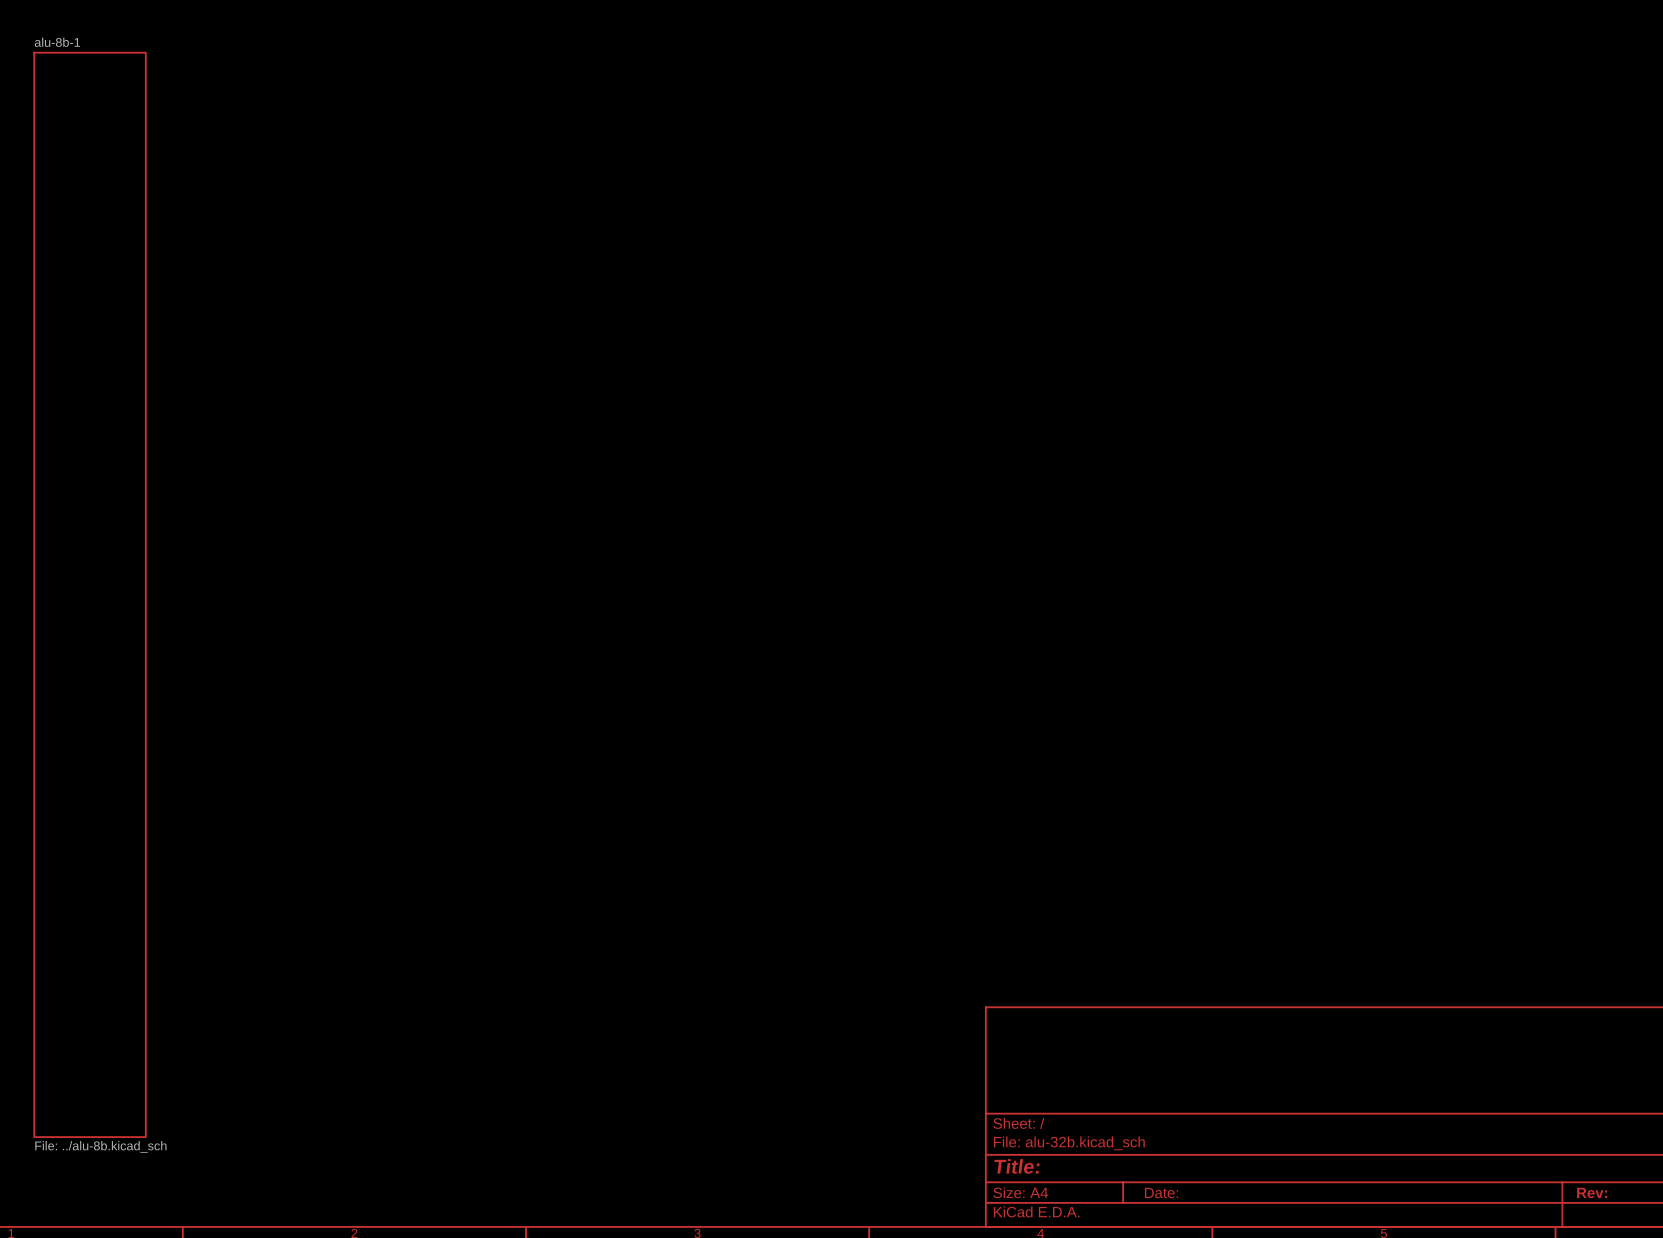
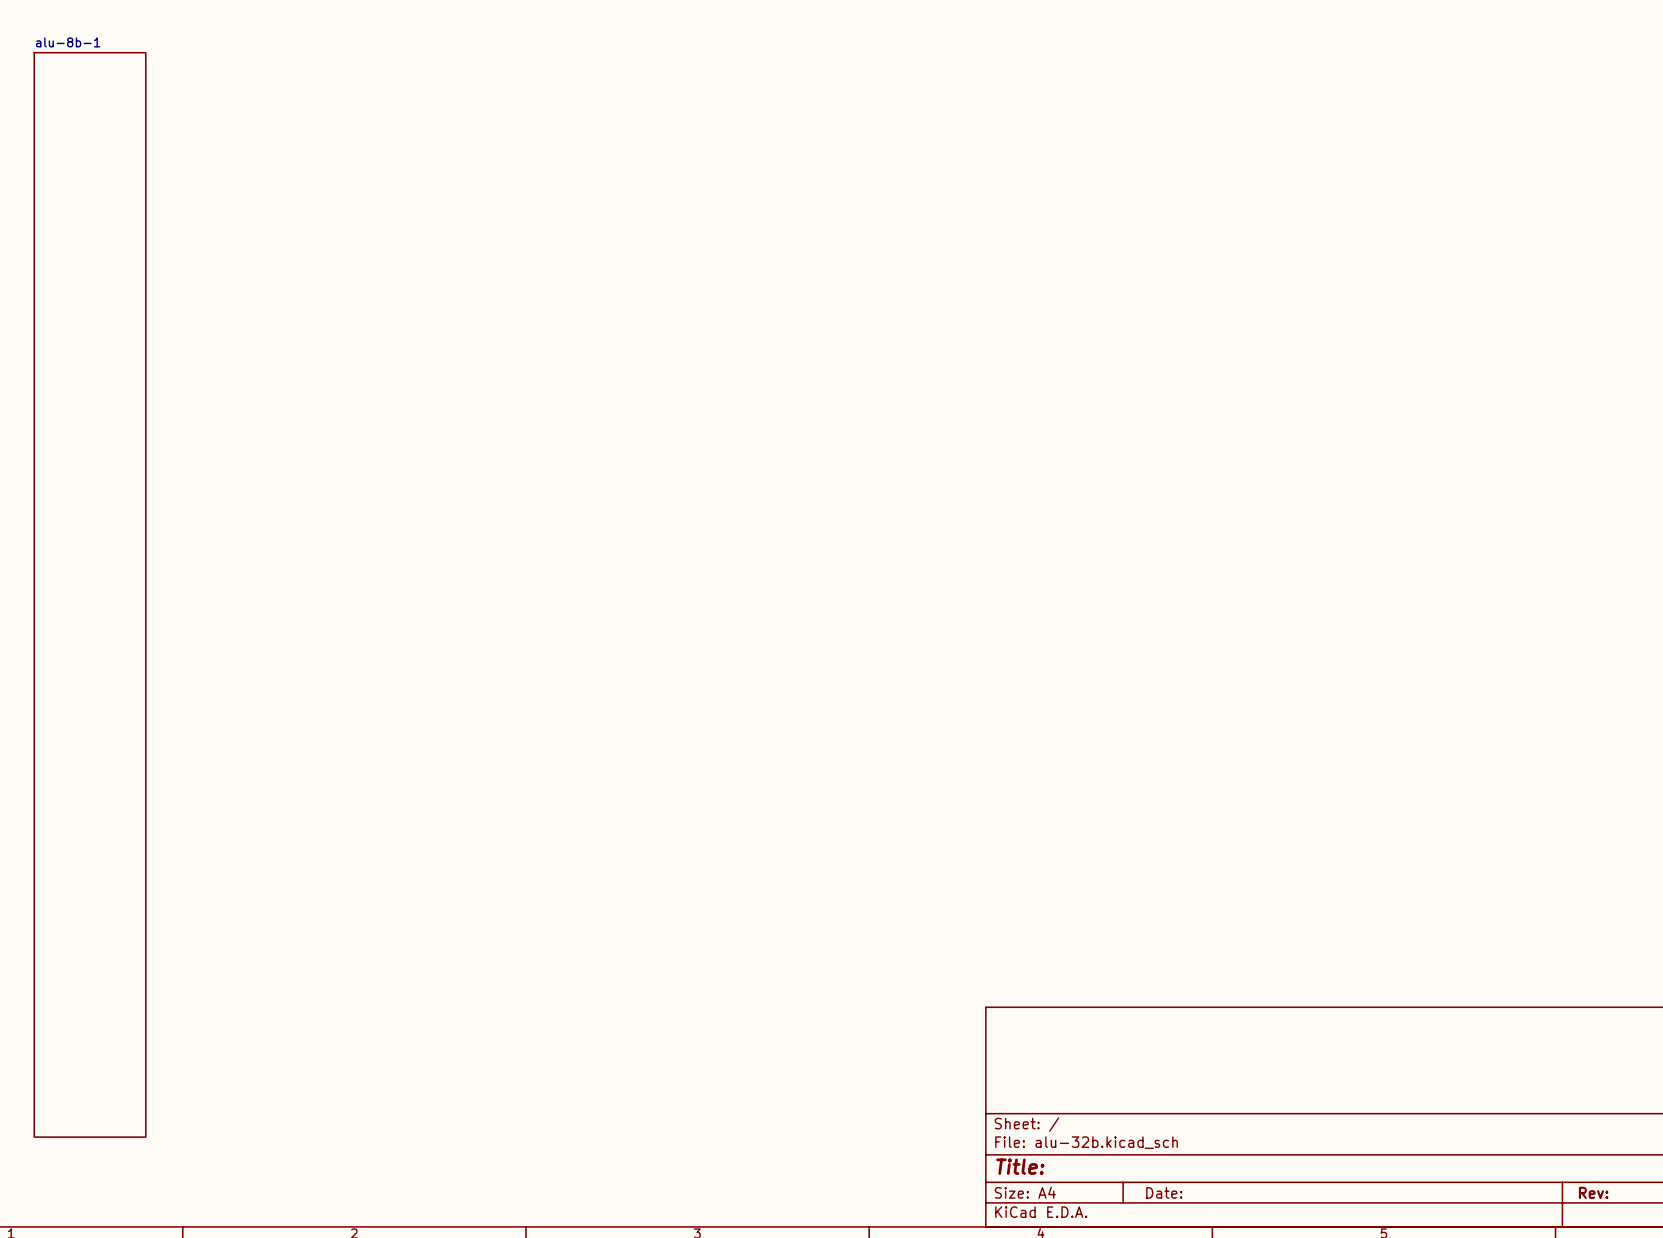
sheet alu-8b-1 value: File: ../alu-8b.kicad_sch (100, 1146) -> none

